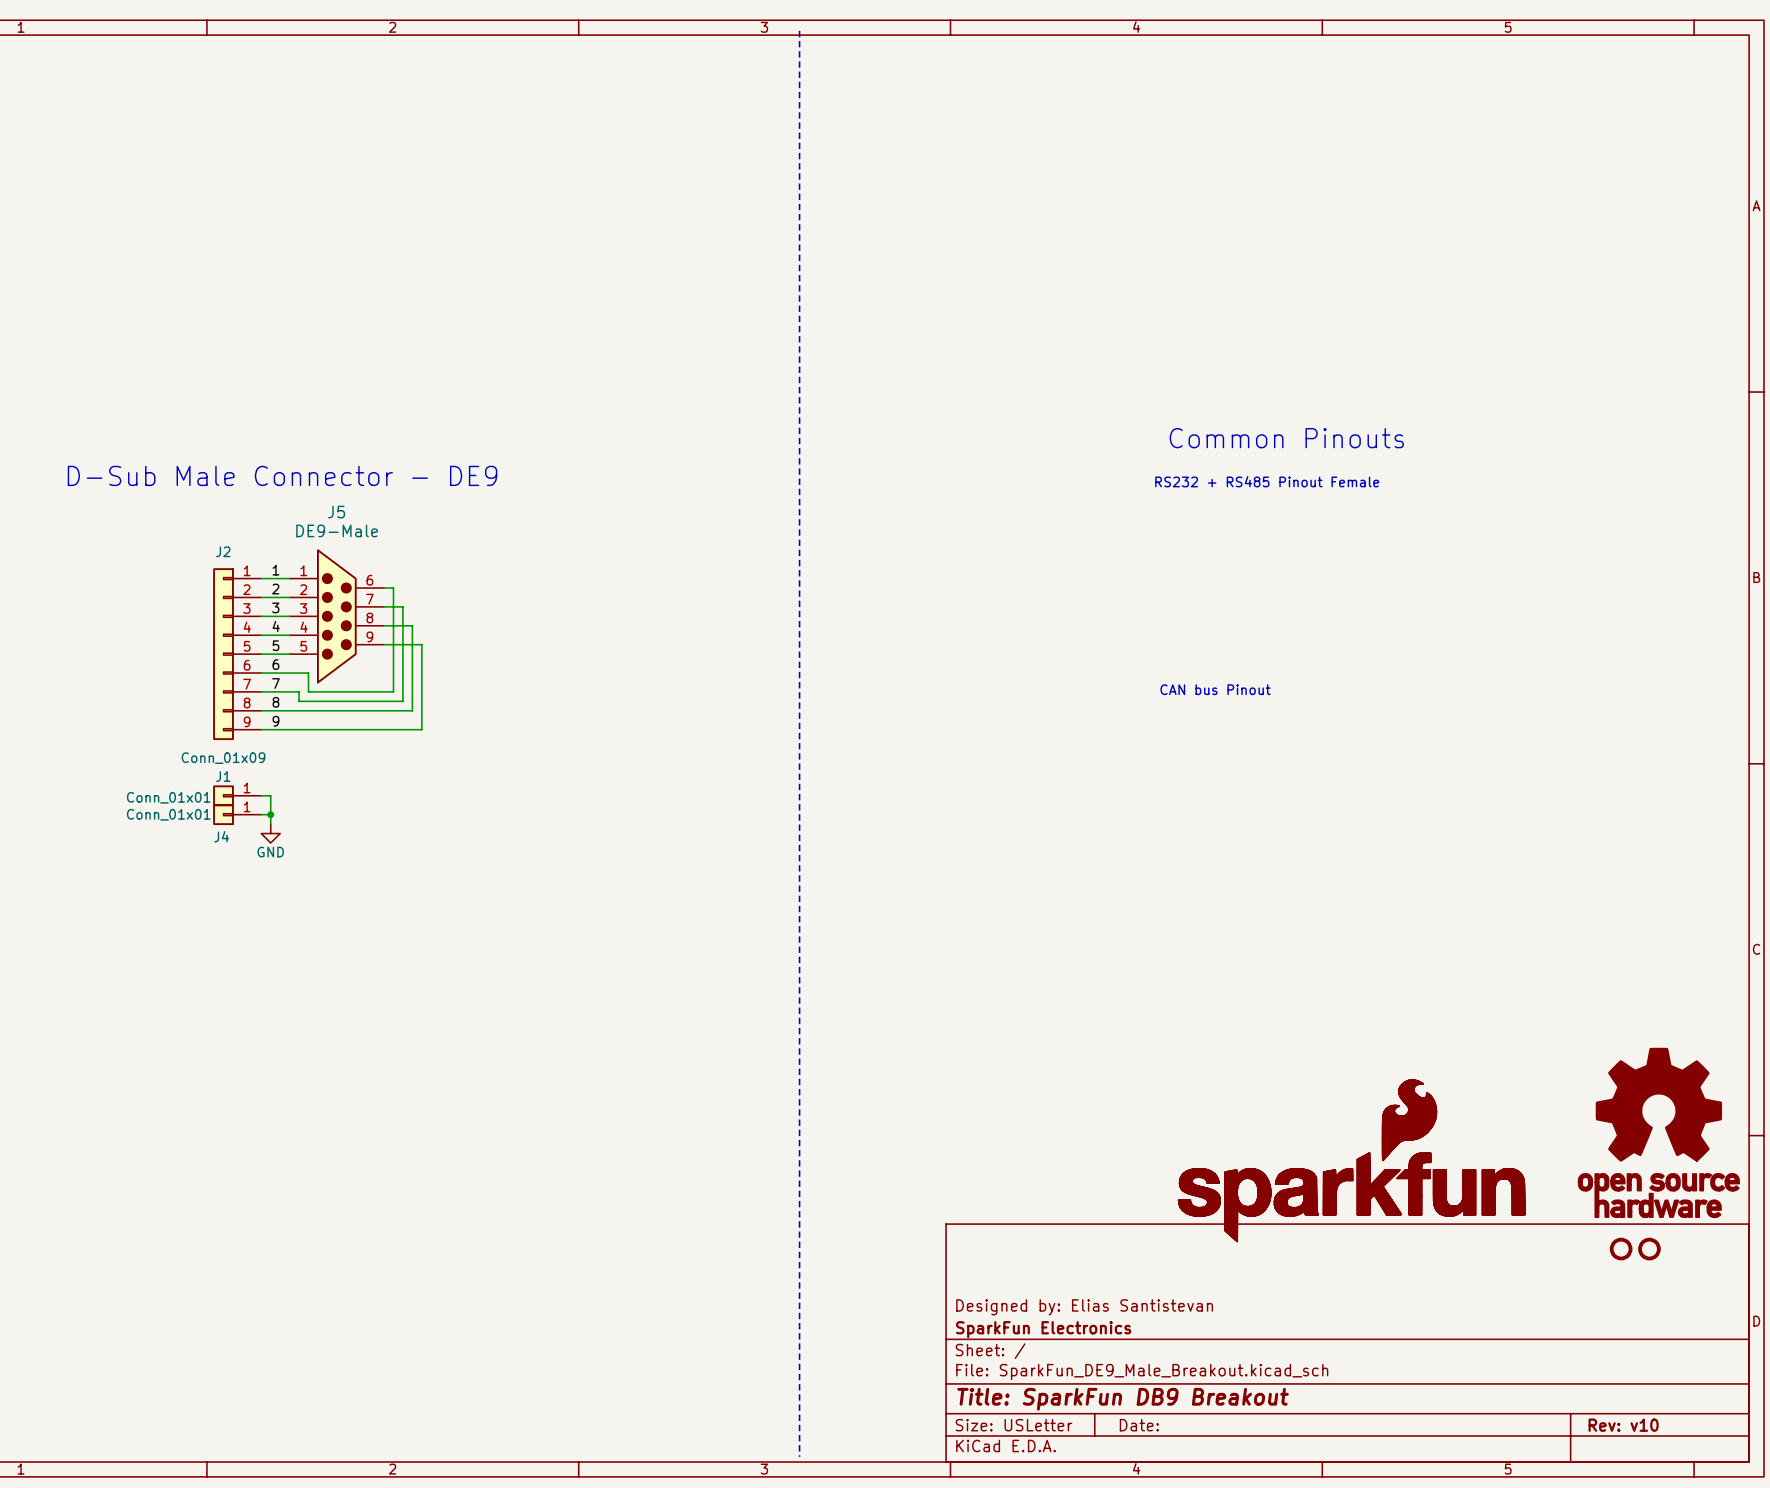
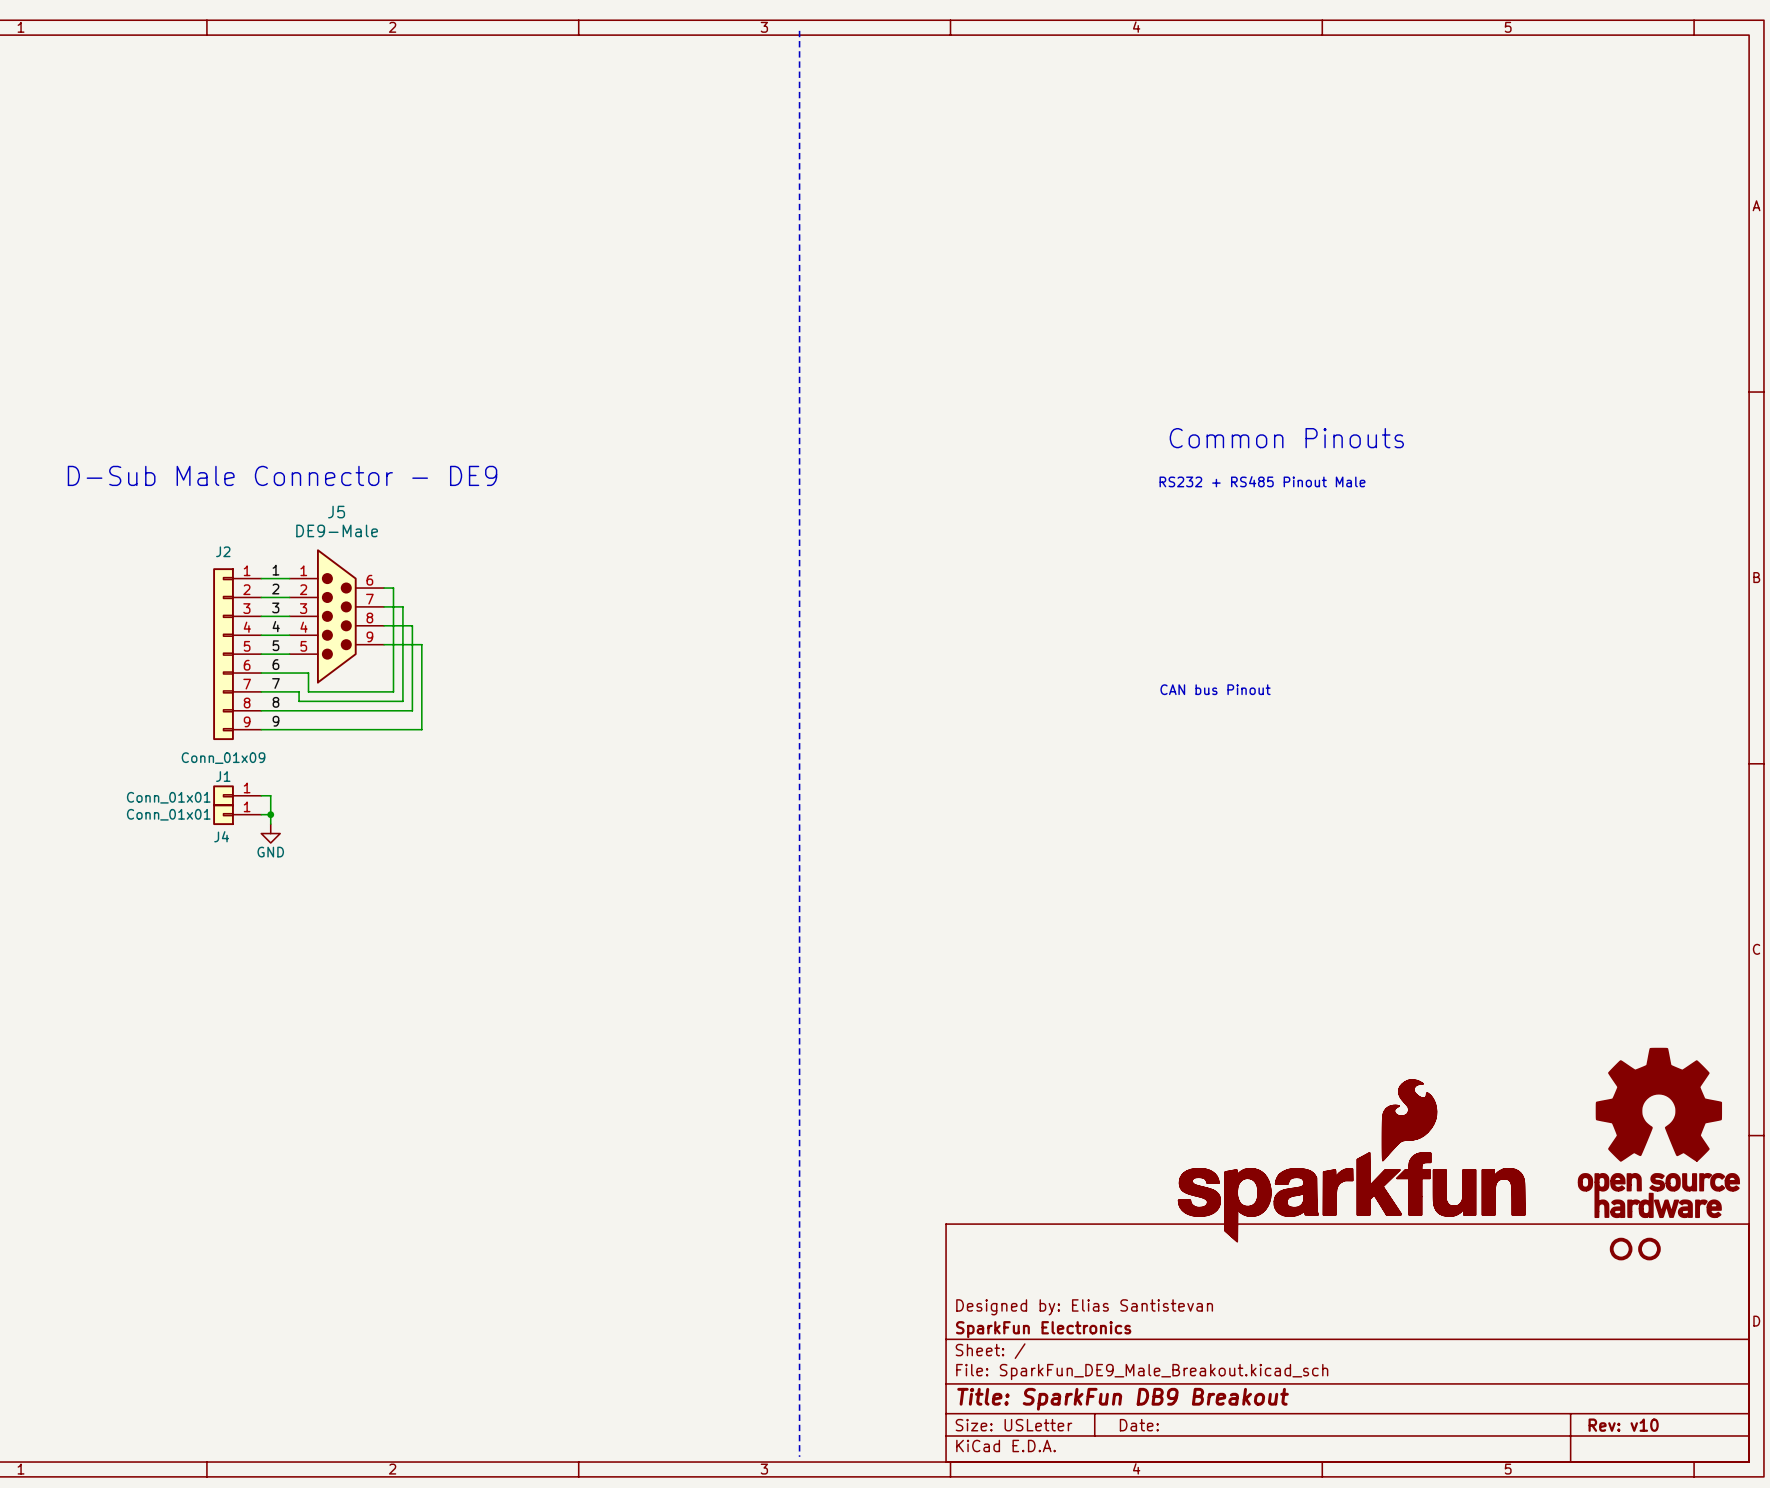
text: RS232 + RS485 Pinout Female (1267, 481) -> RS232 + RS485 Pinout Male (1262, 481)

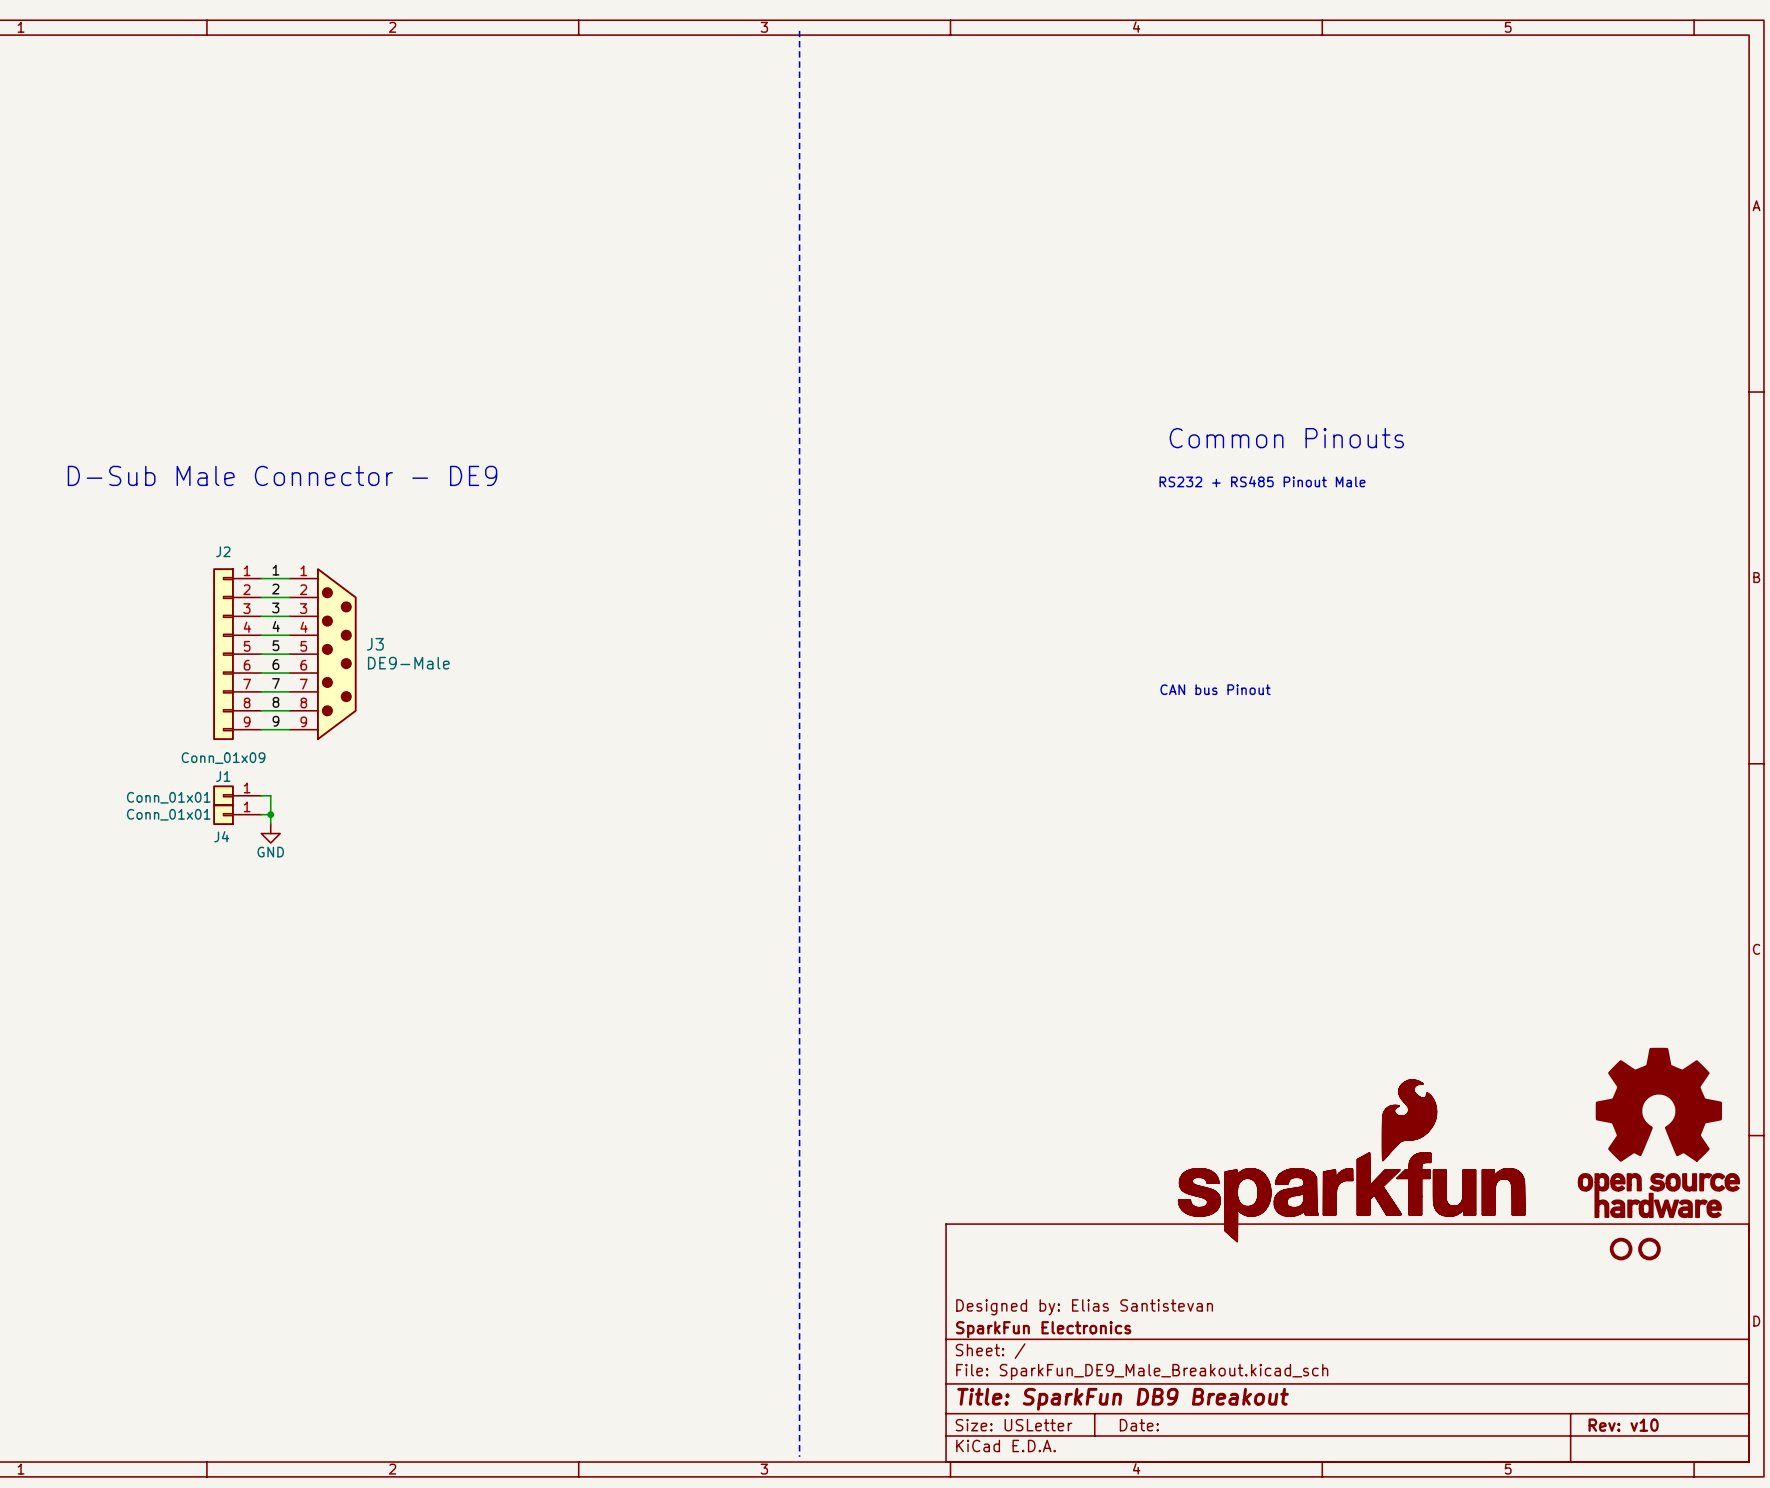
wire: (384, 588) (393, 588) (393, 691) (308, 691) (308, 673) (289, 673) -> none
wire: (384, 606) (402, 606) (402, 701) (299, 701) (299, 691) (289, 691) -> none
J5: DE9-Male (336, 616) -> none
wire: (384, 625) (412, 625) (412, 710) (289, 710) -> none
wire: (384, 644) (421, 644) (421, 729) (289, 729) -> none
J3: none -> DE9-Male (323, 654)

